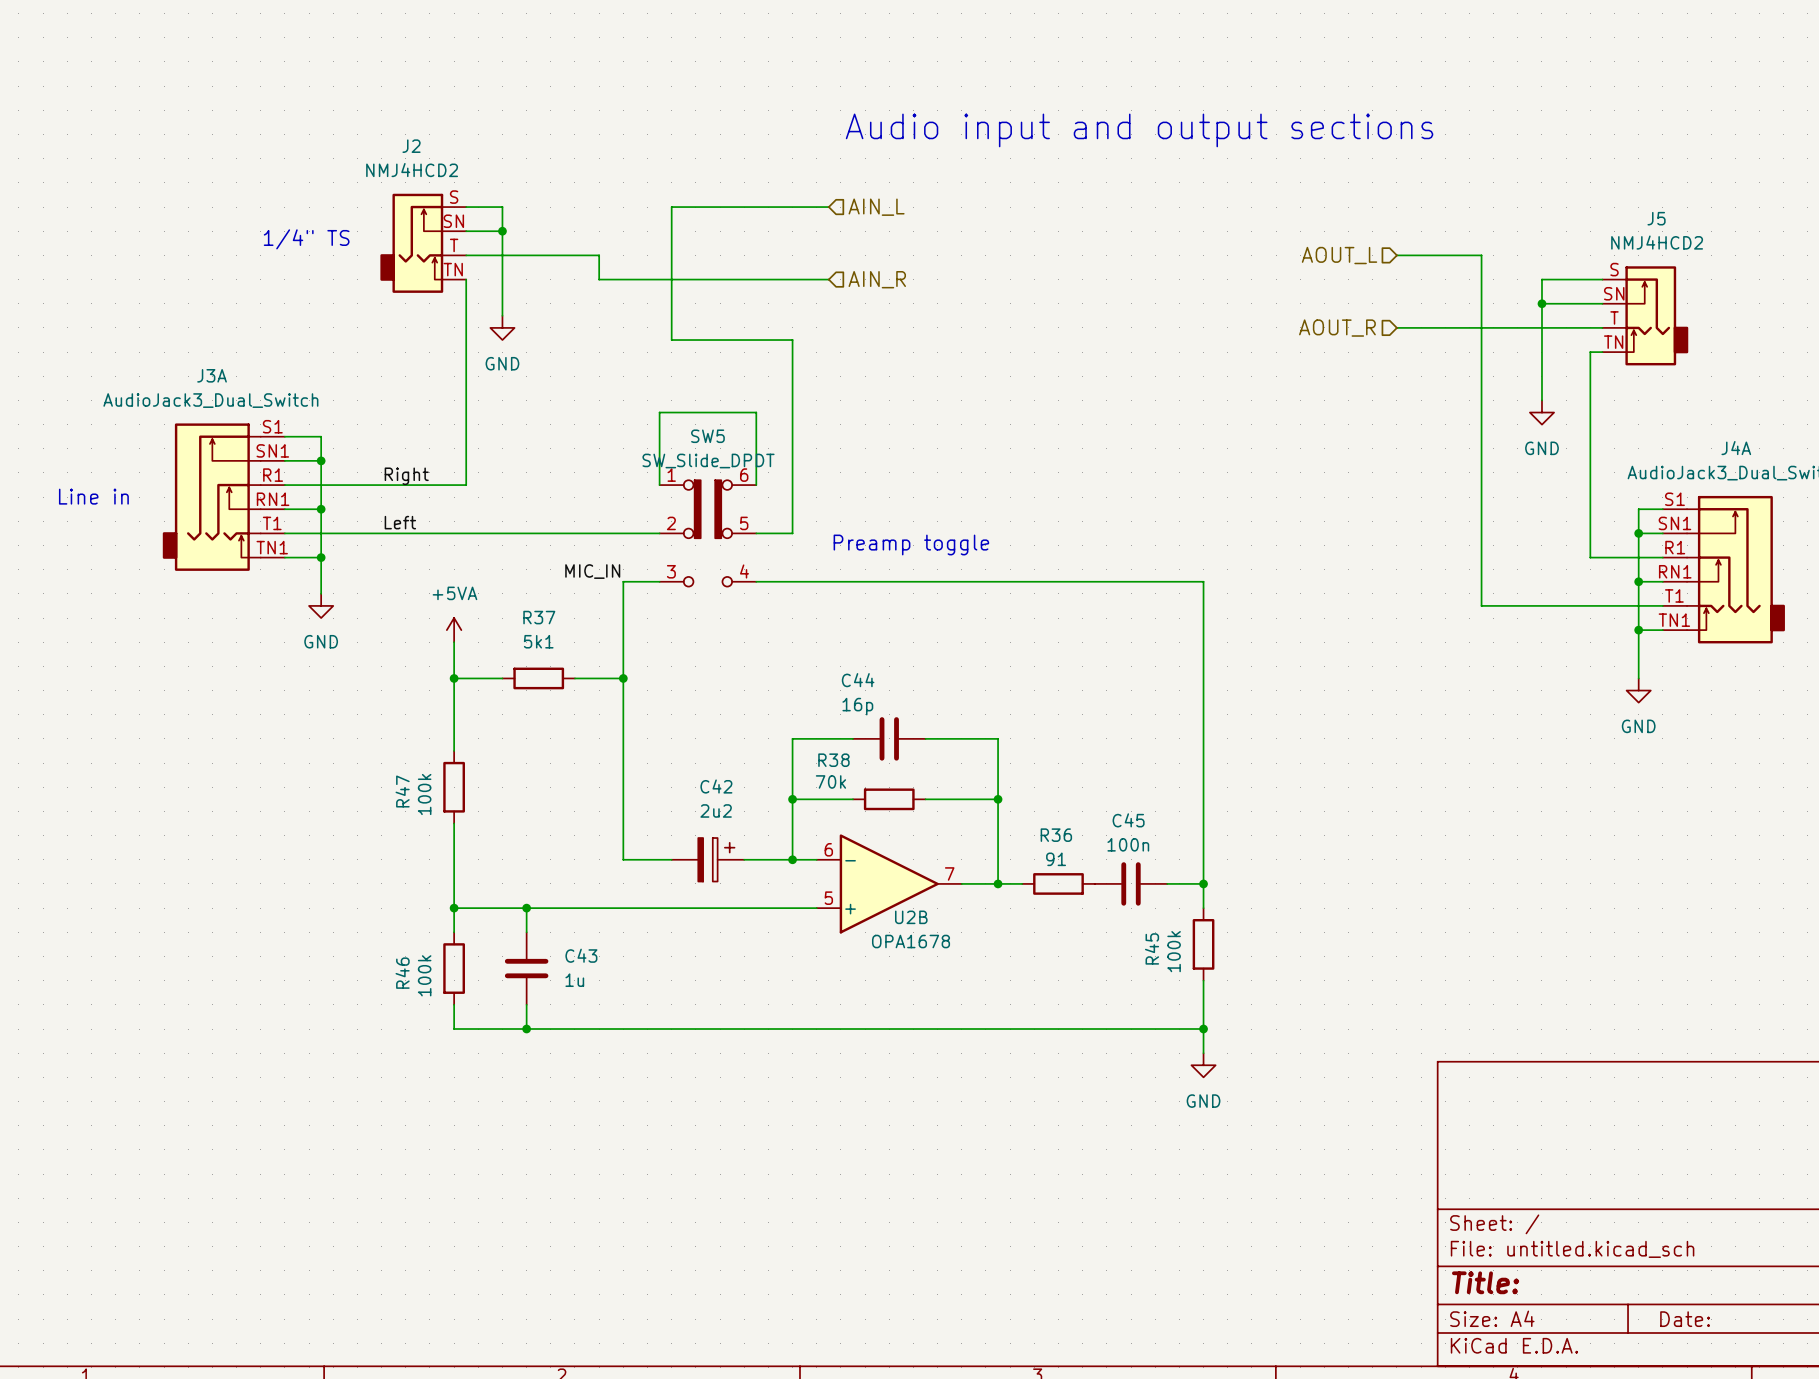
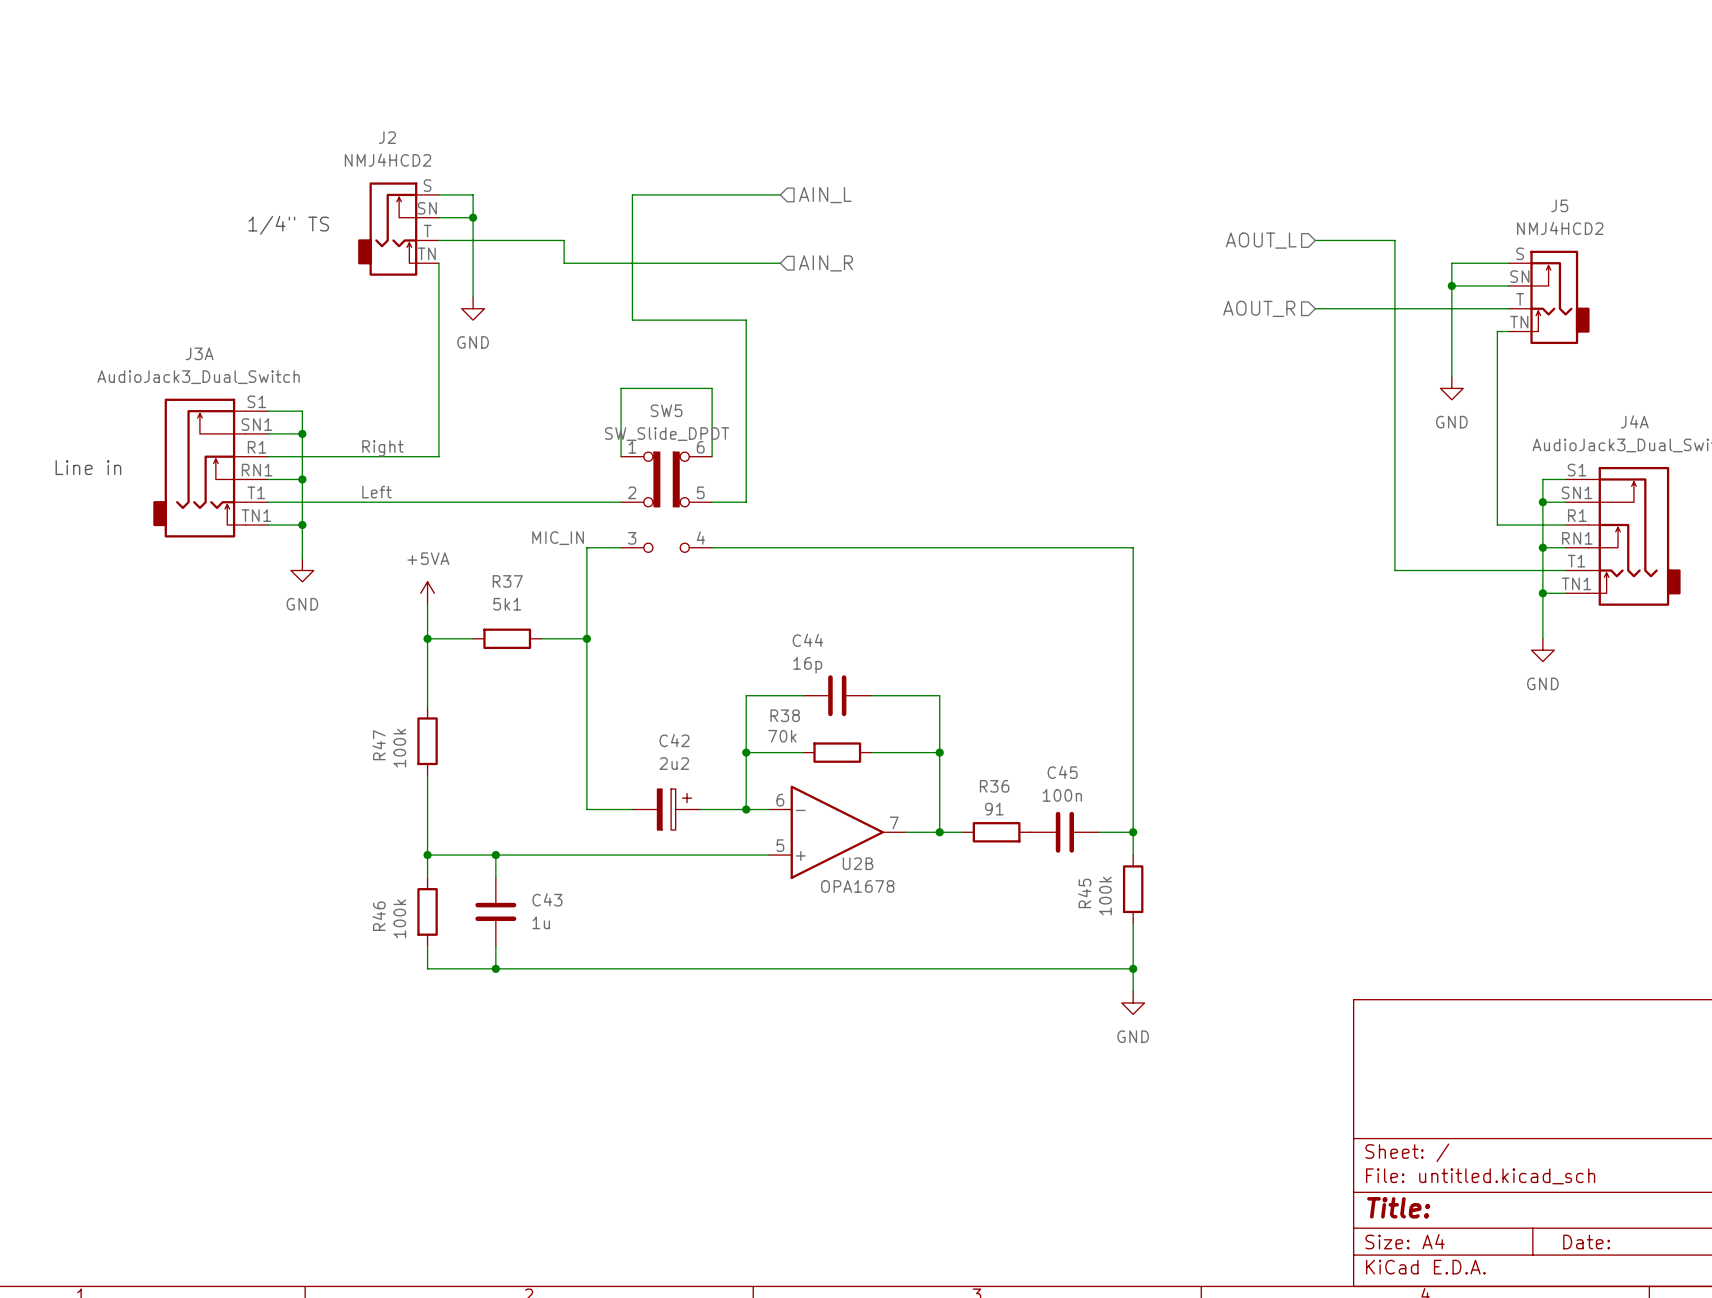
text: Audio input and output sections (1139, 130) -> none
text: Preamp toggle (911, 544) -> none

